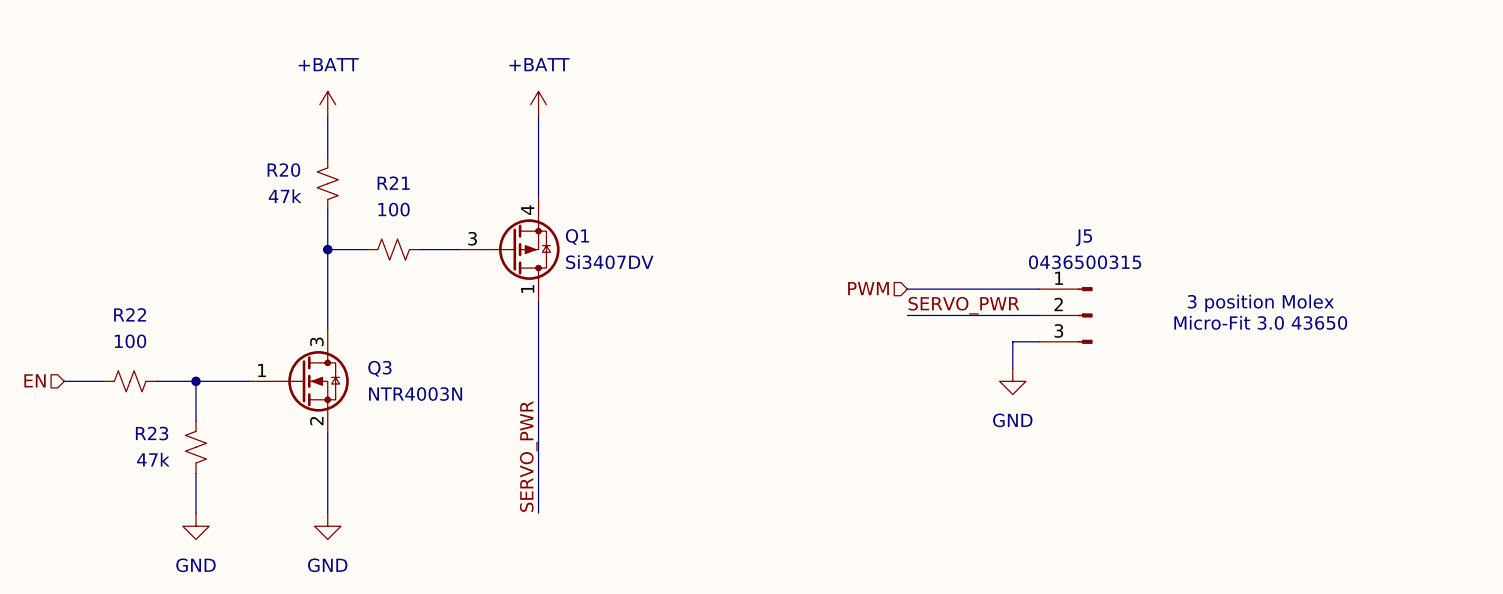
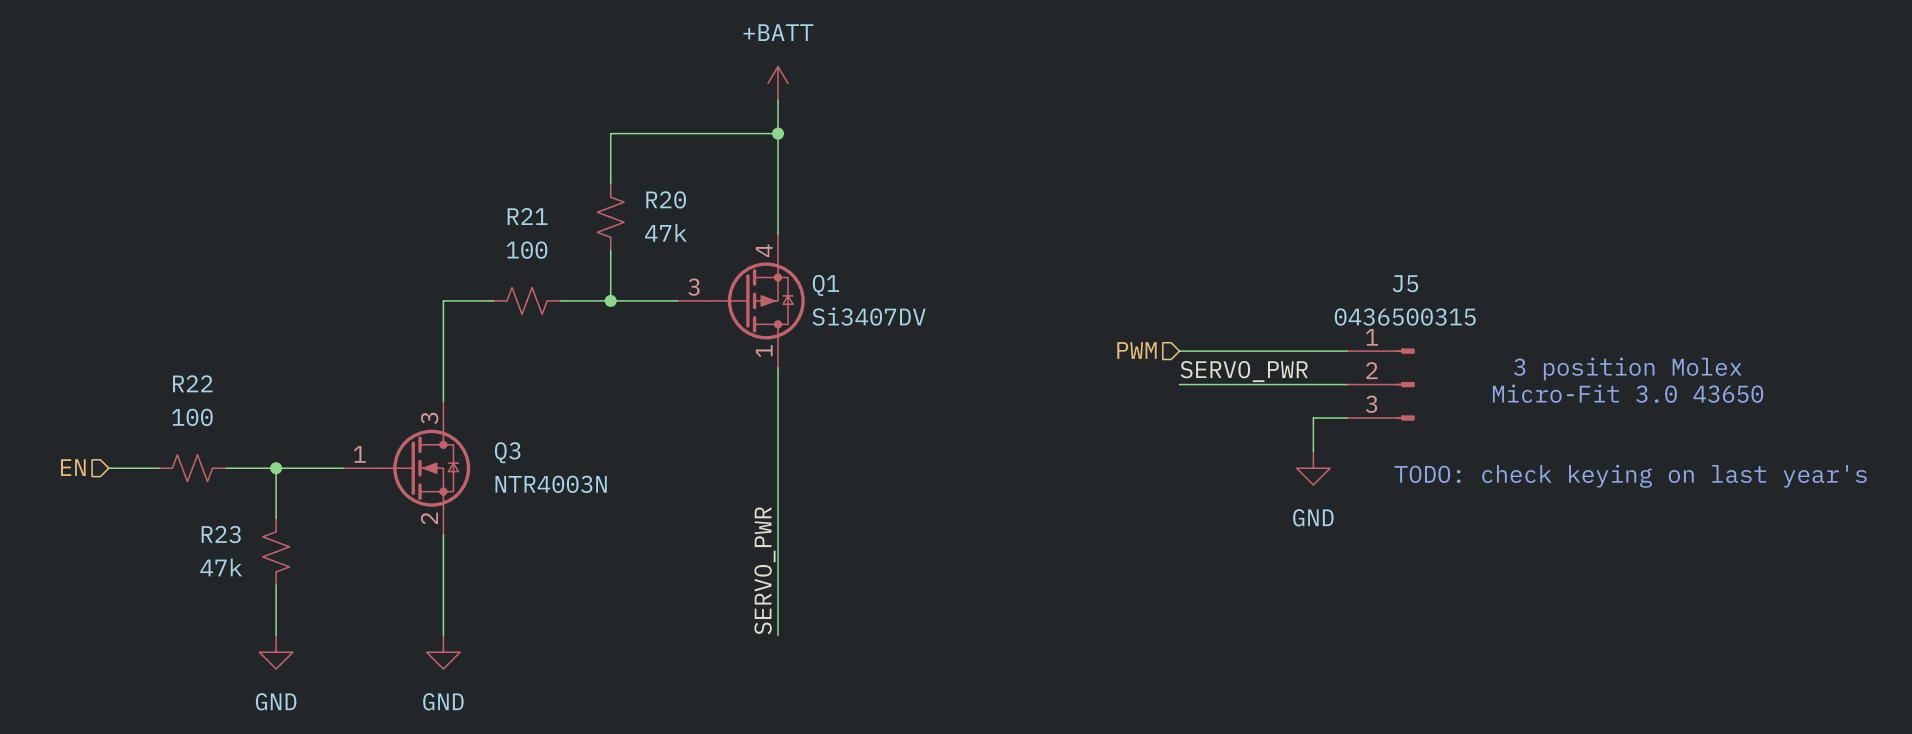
wire: none -> (778, 100) (778, 234)
power symbol: +BATT (327, 104) -> none
power symbol position: +BATT (538, 104) -> +BATT (778, 83)
wire: (327, 117) (327, 157) -> none
wire: (538, 117) (538, 196) -> none
wire: none -> (778, 133) (610, 133) (610, 183)
junction: none -> (778, 133)
R20 flip: as is (327, 183) -> left-right (610, 217)
R20 position: (327, 183) -> (610, 217)
wire: (327, 210) (327, 249) -> none
wire: none -> (610, 250) (610, 300) (677, 300)
junction: (327, 249) -> none
junction: none -> (610, 300)
Q1 position: (509, 249) -> (741, 300)
wire: (538, 302) (538, 513) -> (778, 367) (778, 635)
text: none -> TODO: check keying on last year's (1630, 476)
label position: SERVO_PWR (528, 456) -> SERVO_PWR (764, 570)

